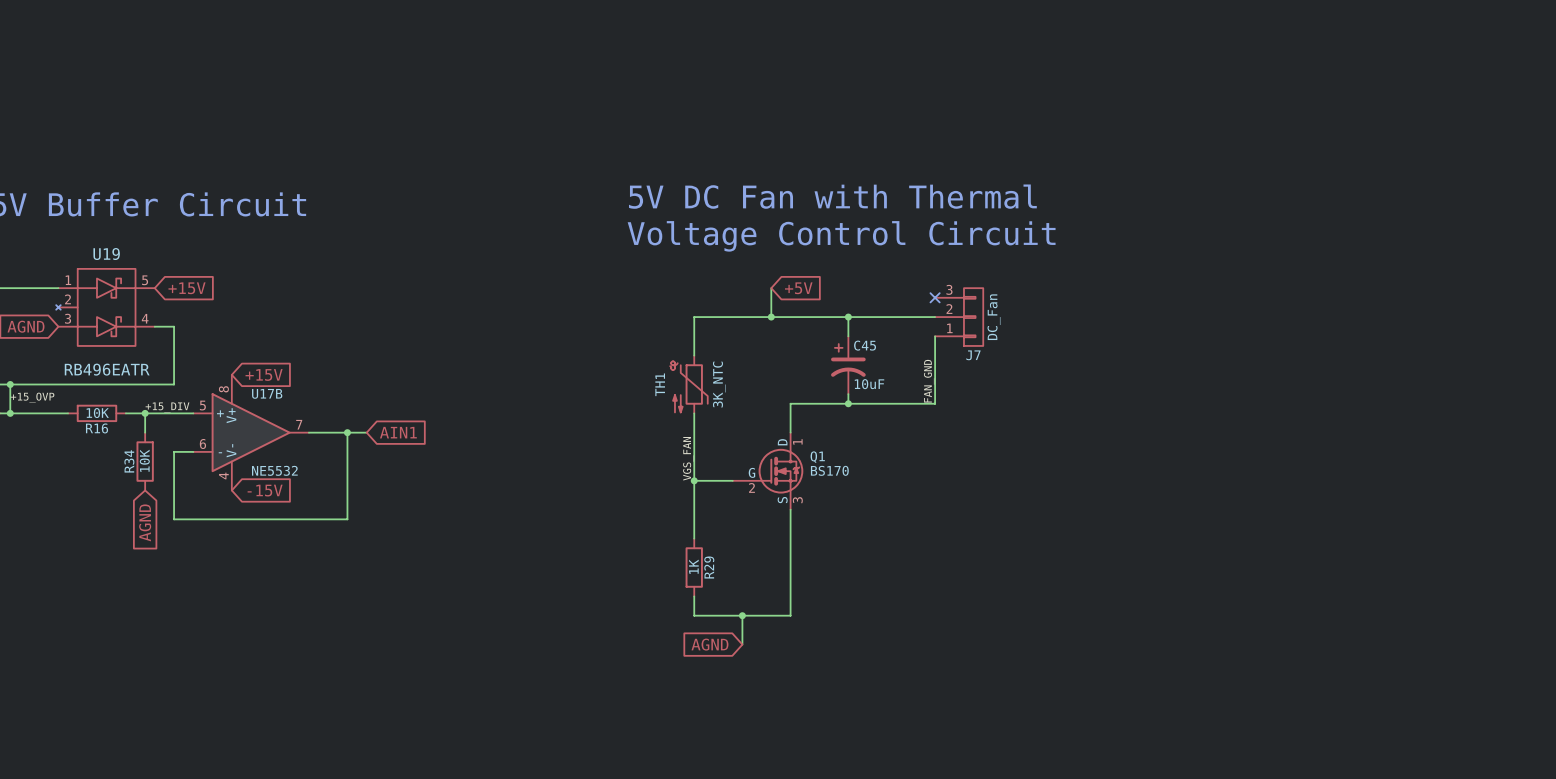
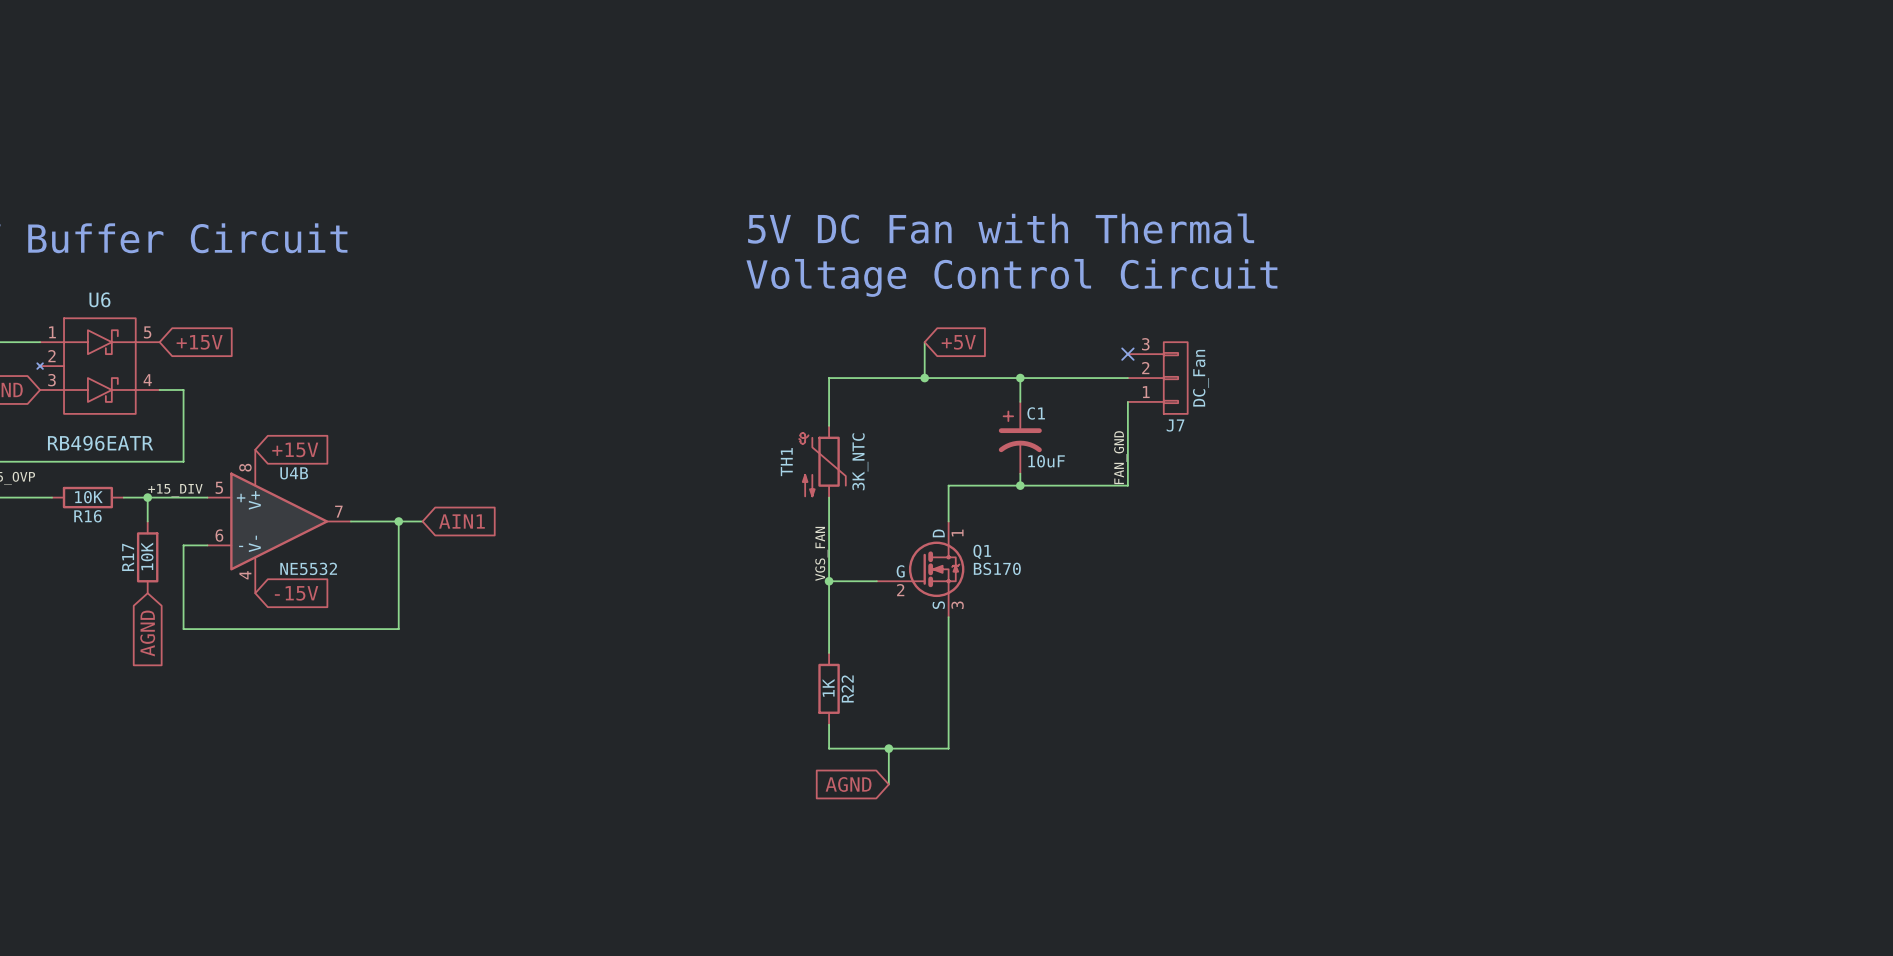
U19 name: U19 (106, 254) -> U6 (99, 299)
C45 name: C45 (865, 345) -> C1 (1036, 413)
U17B name: U17B (267, 393) -> U4B (294, 473)
R34 name: R34 (129, 461) -> R17 (128, 557)
R29 name: R29 (709, 567) -> R22 (847, 688)

